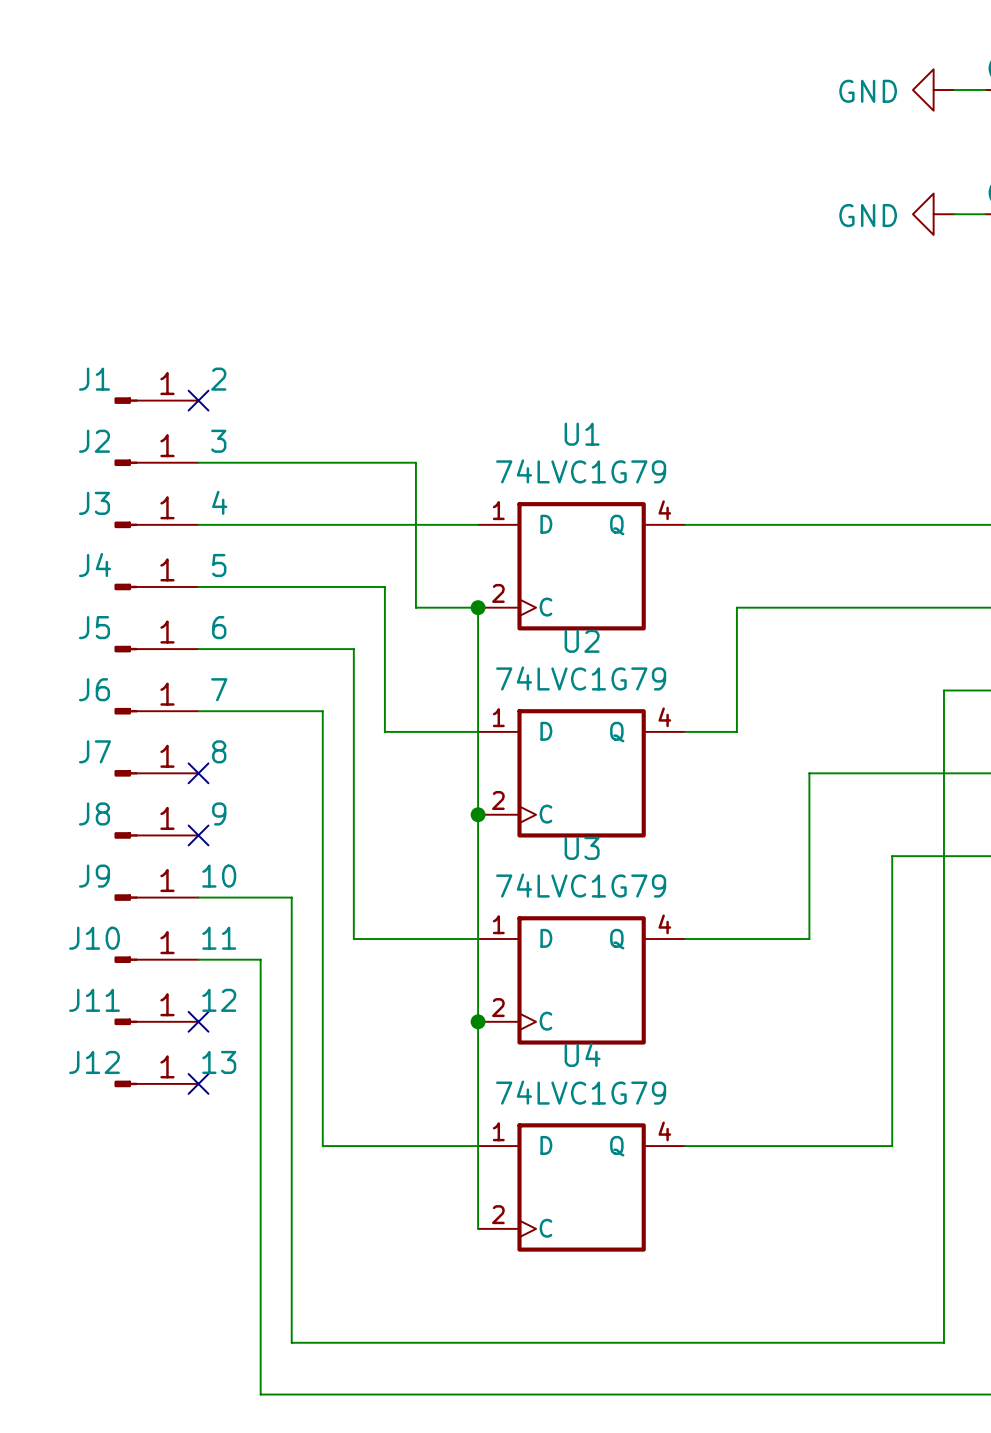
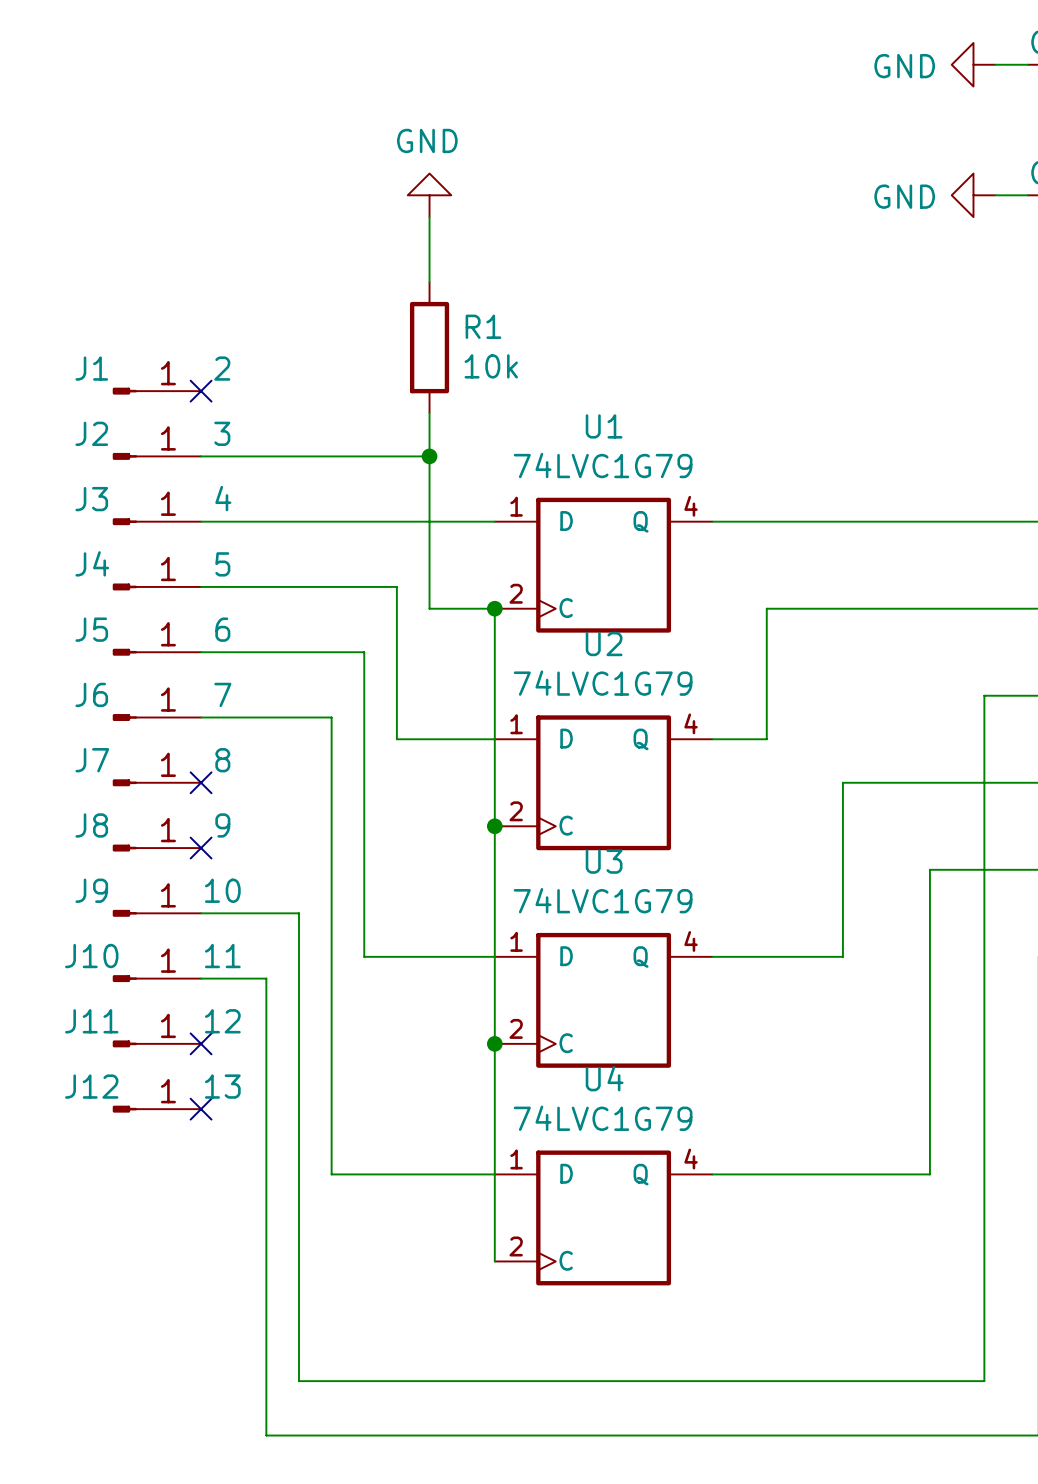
power symbol: none -> GND (429, 195)
wire: none -> (429, 217) (429, 282)
R1: none -> 10k (429, 347)
wire: none -> (429, 412) (429, 456)
junction: none -> (429, 456)

